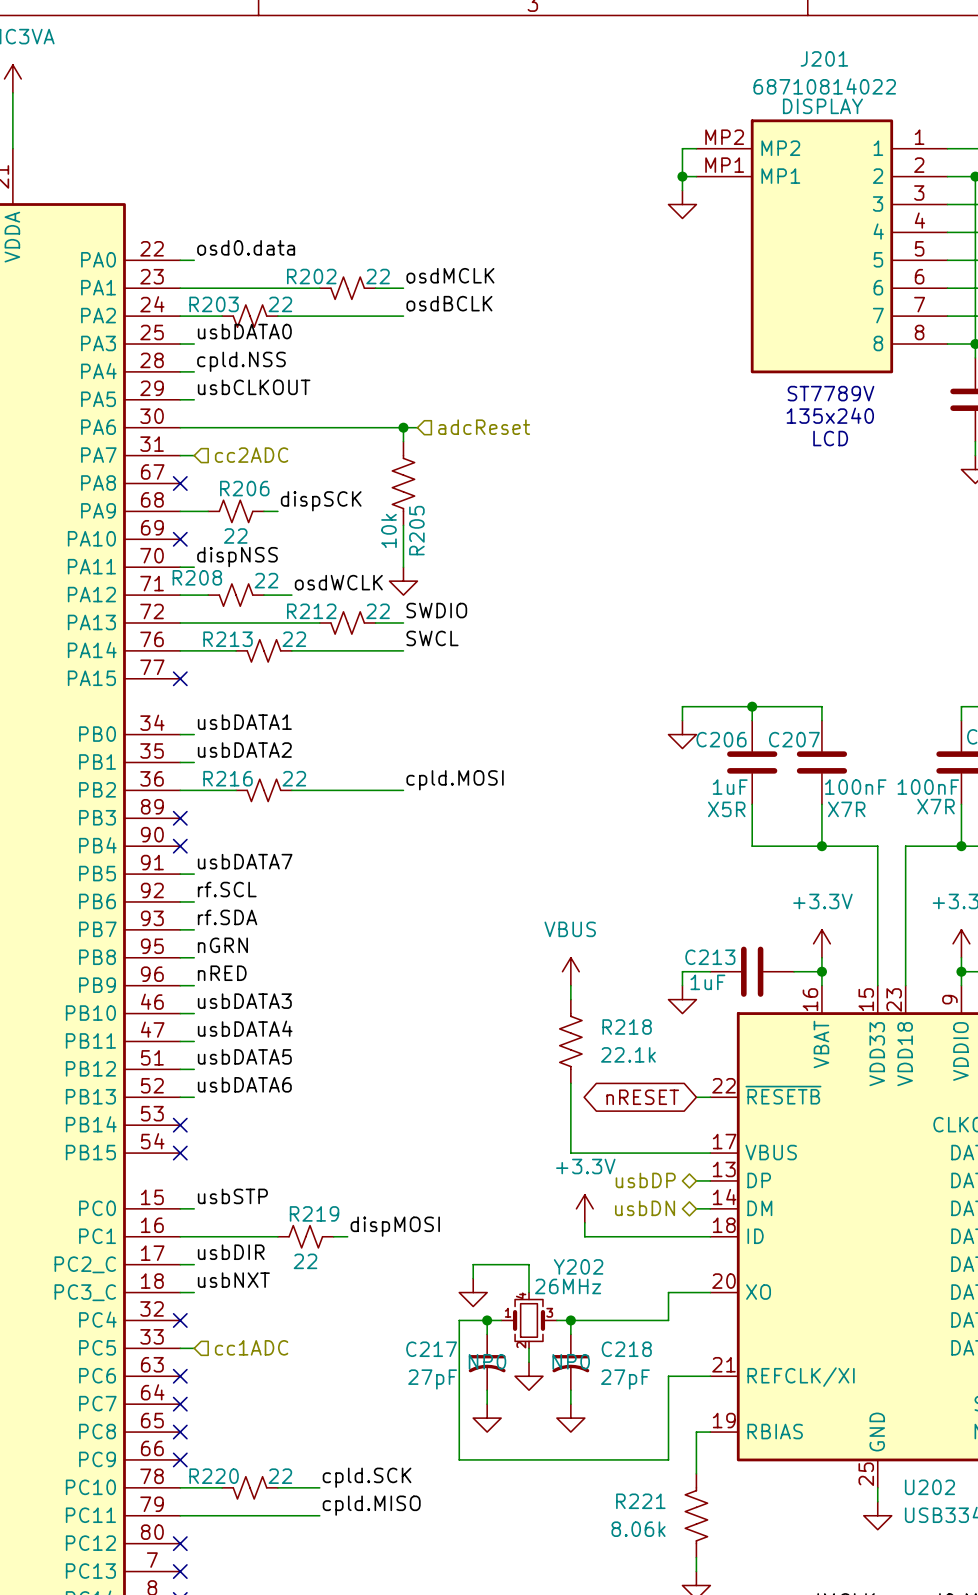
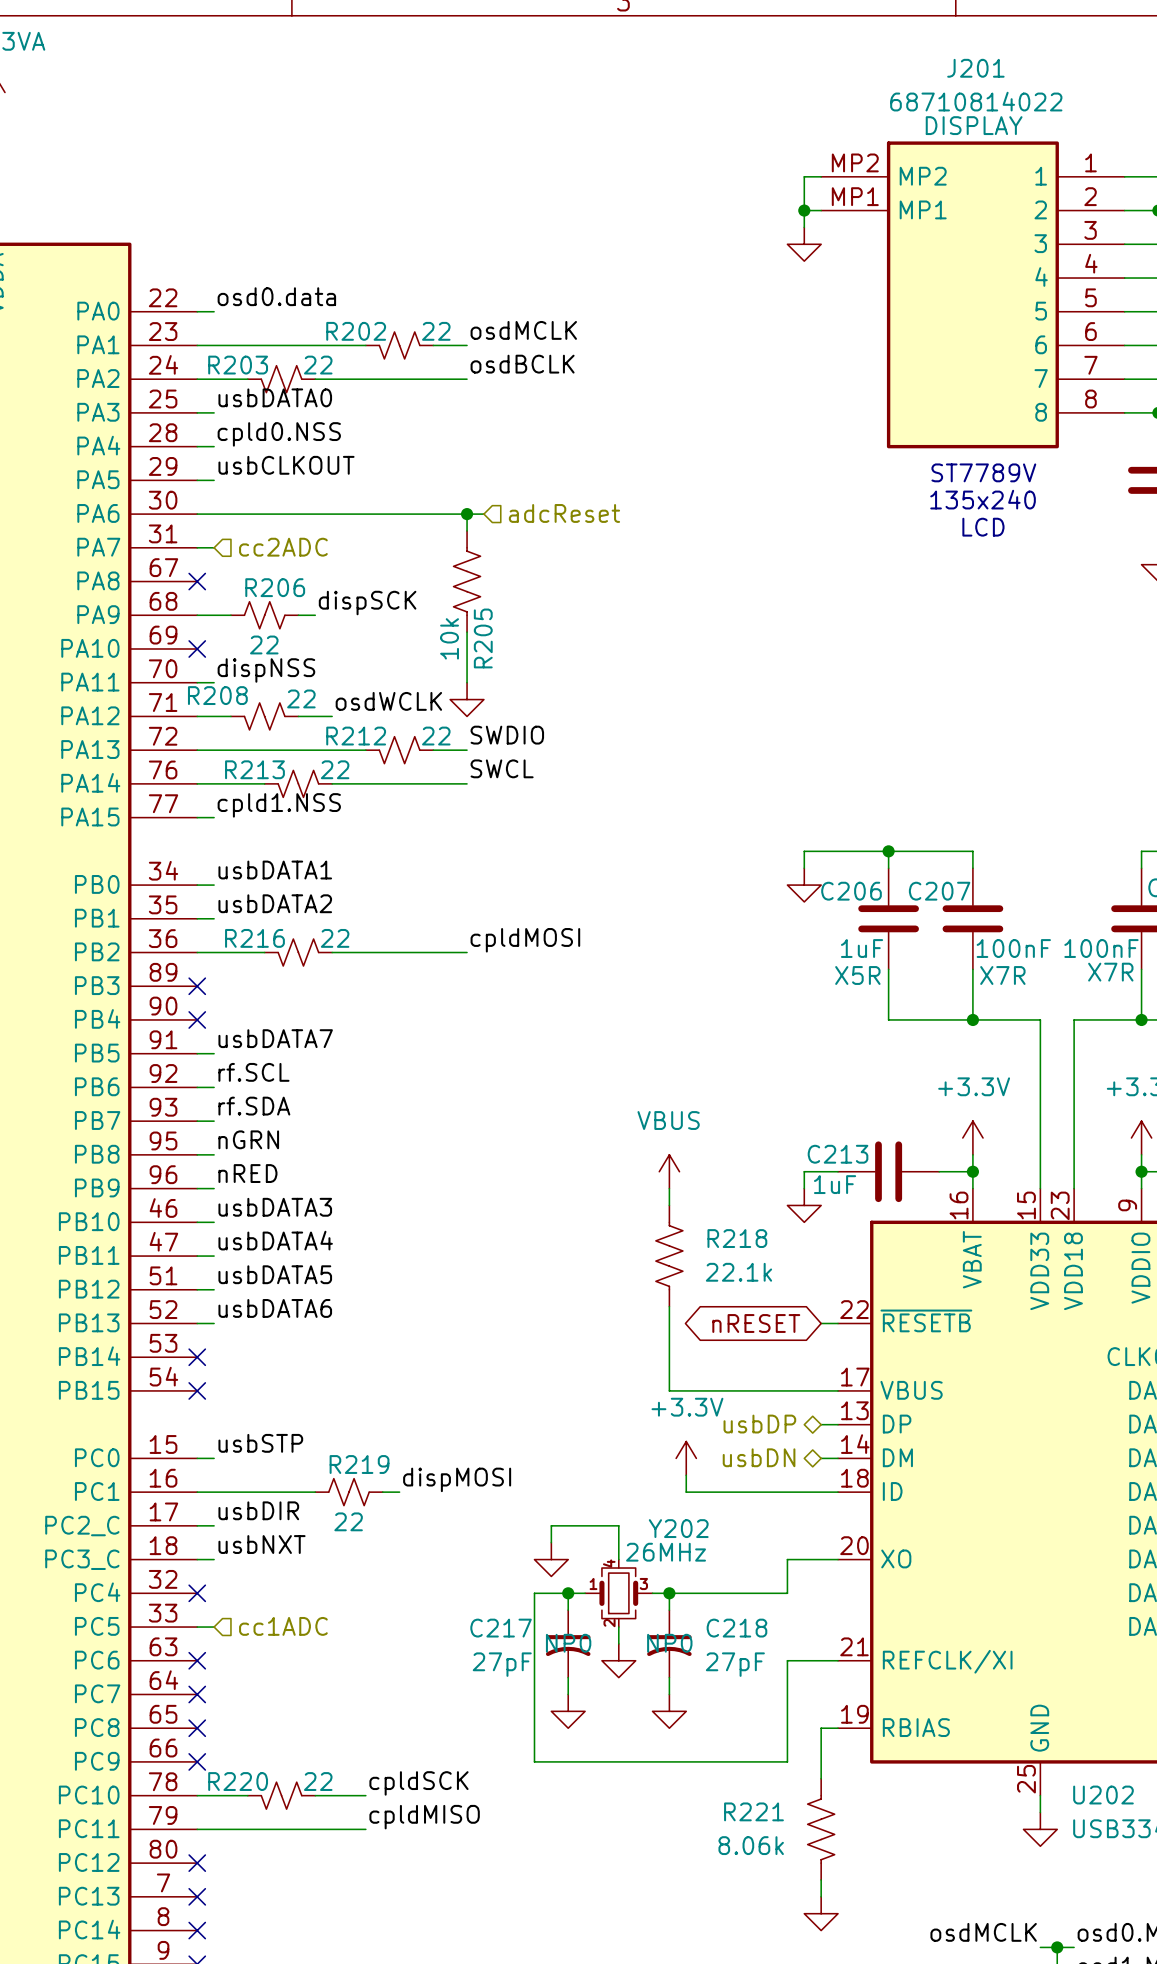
label: cpld.NSS (241, 361) -> cpld0.NSS (279, 434)
label: none -> cpld1.NSS (279, 805)
wire: none -> (197, 817) (214, 817)
no-connect mark: (180, 678) -> none
label: cpld.MOSI (455, 780) -> cpldMOSI (525, 940)
label: cpld.SCK (367, 1477) -> cpldSCK (418, 1783)
label: cpld.MISO (371, 1505) -> cpldMISO (424, 1817)

